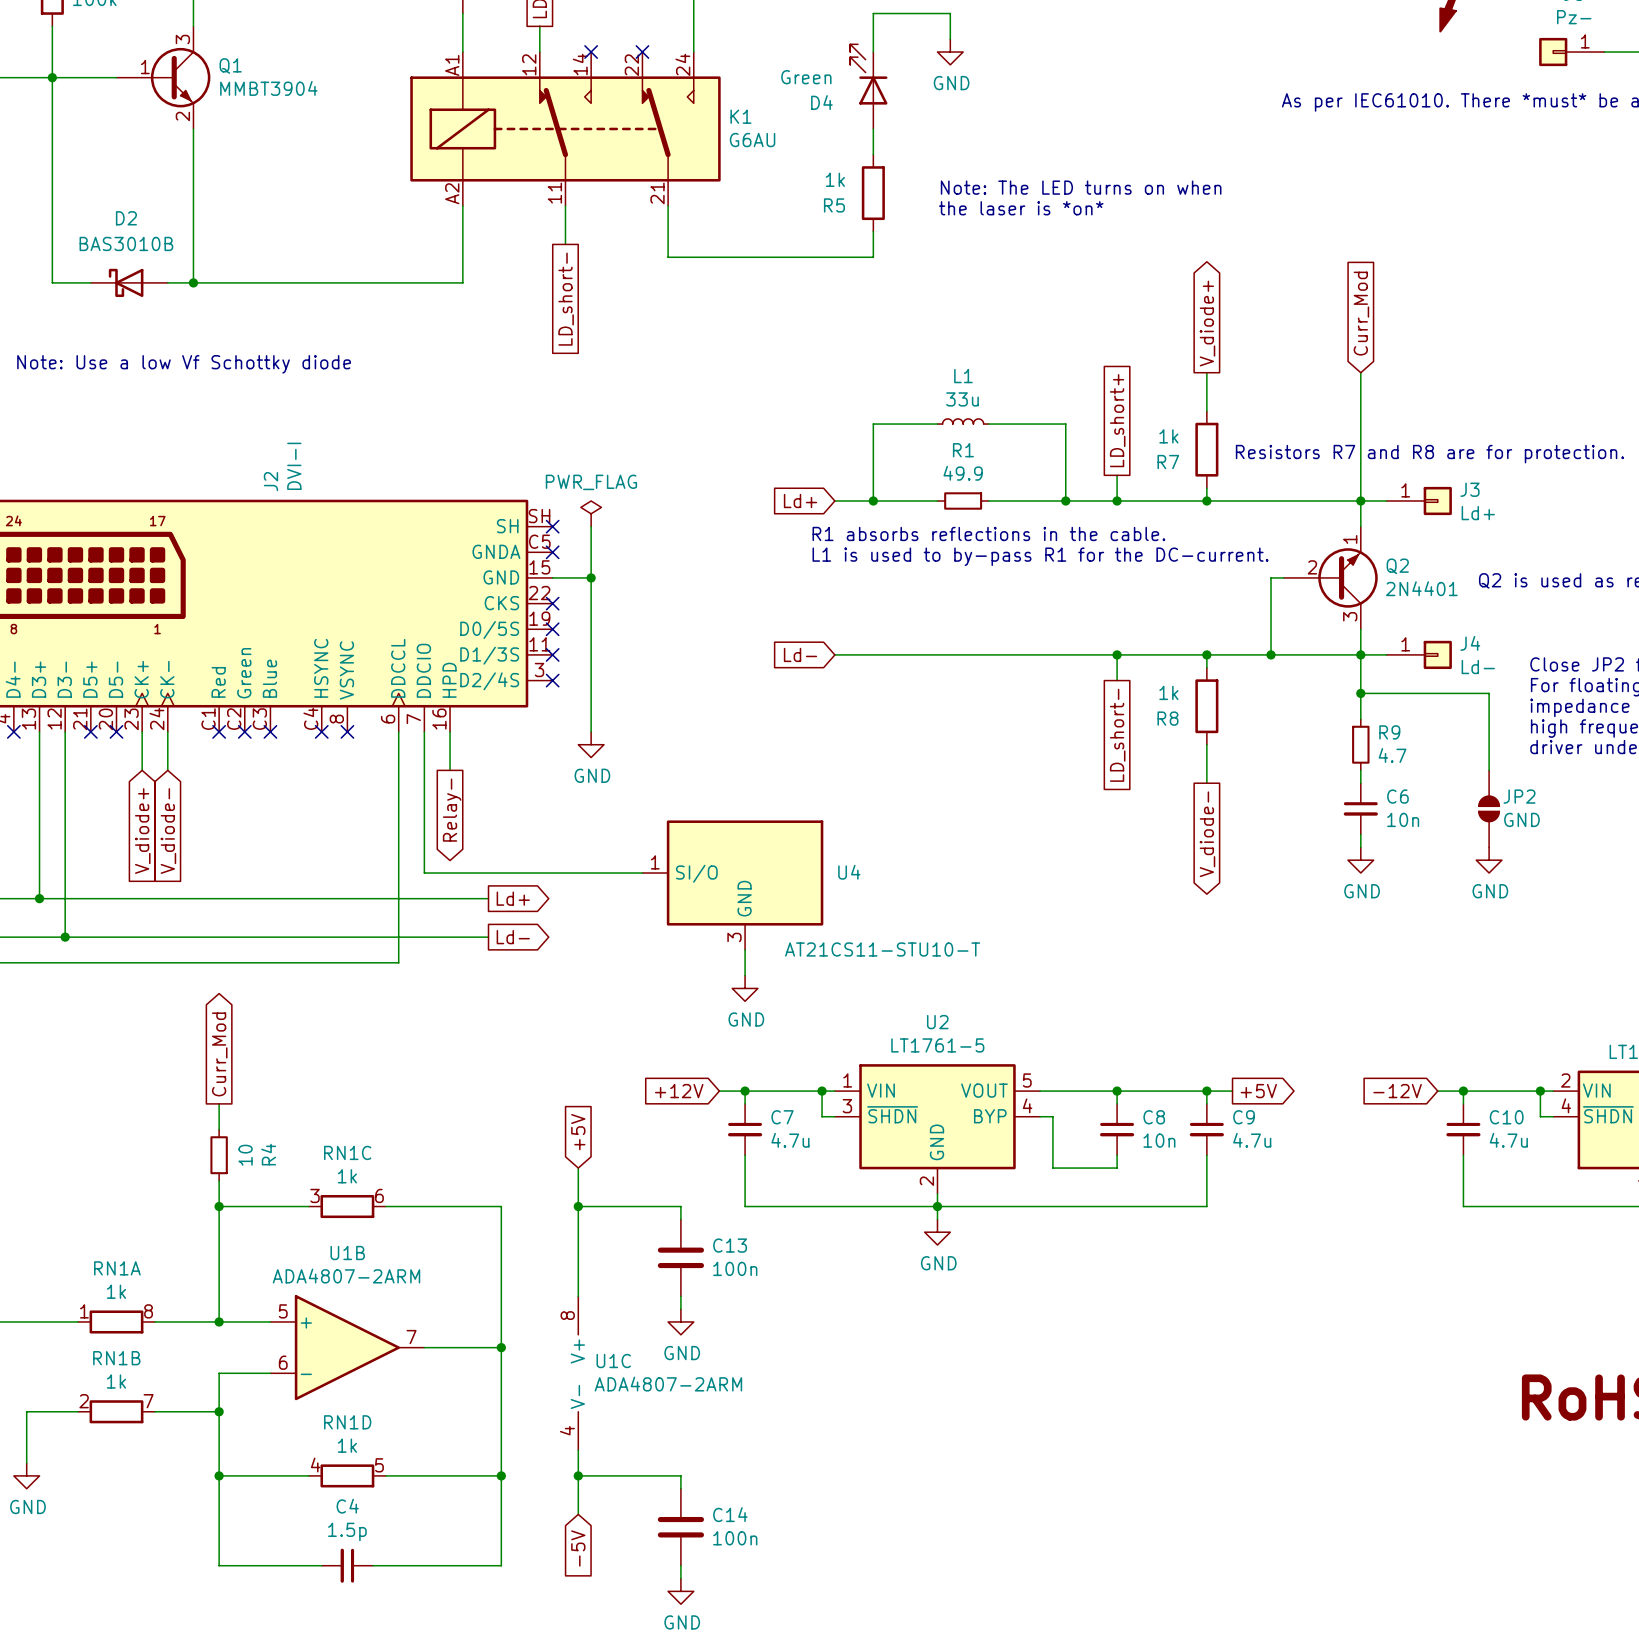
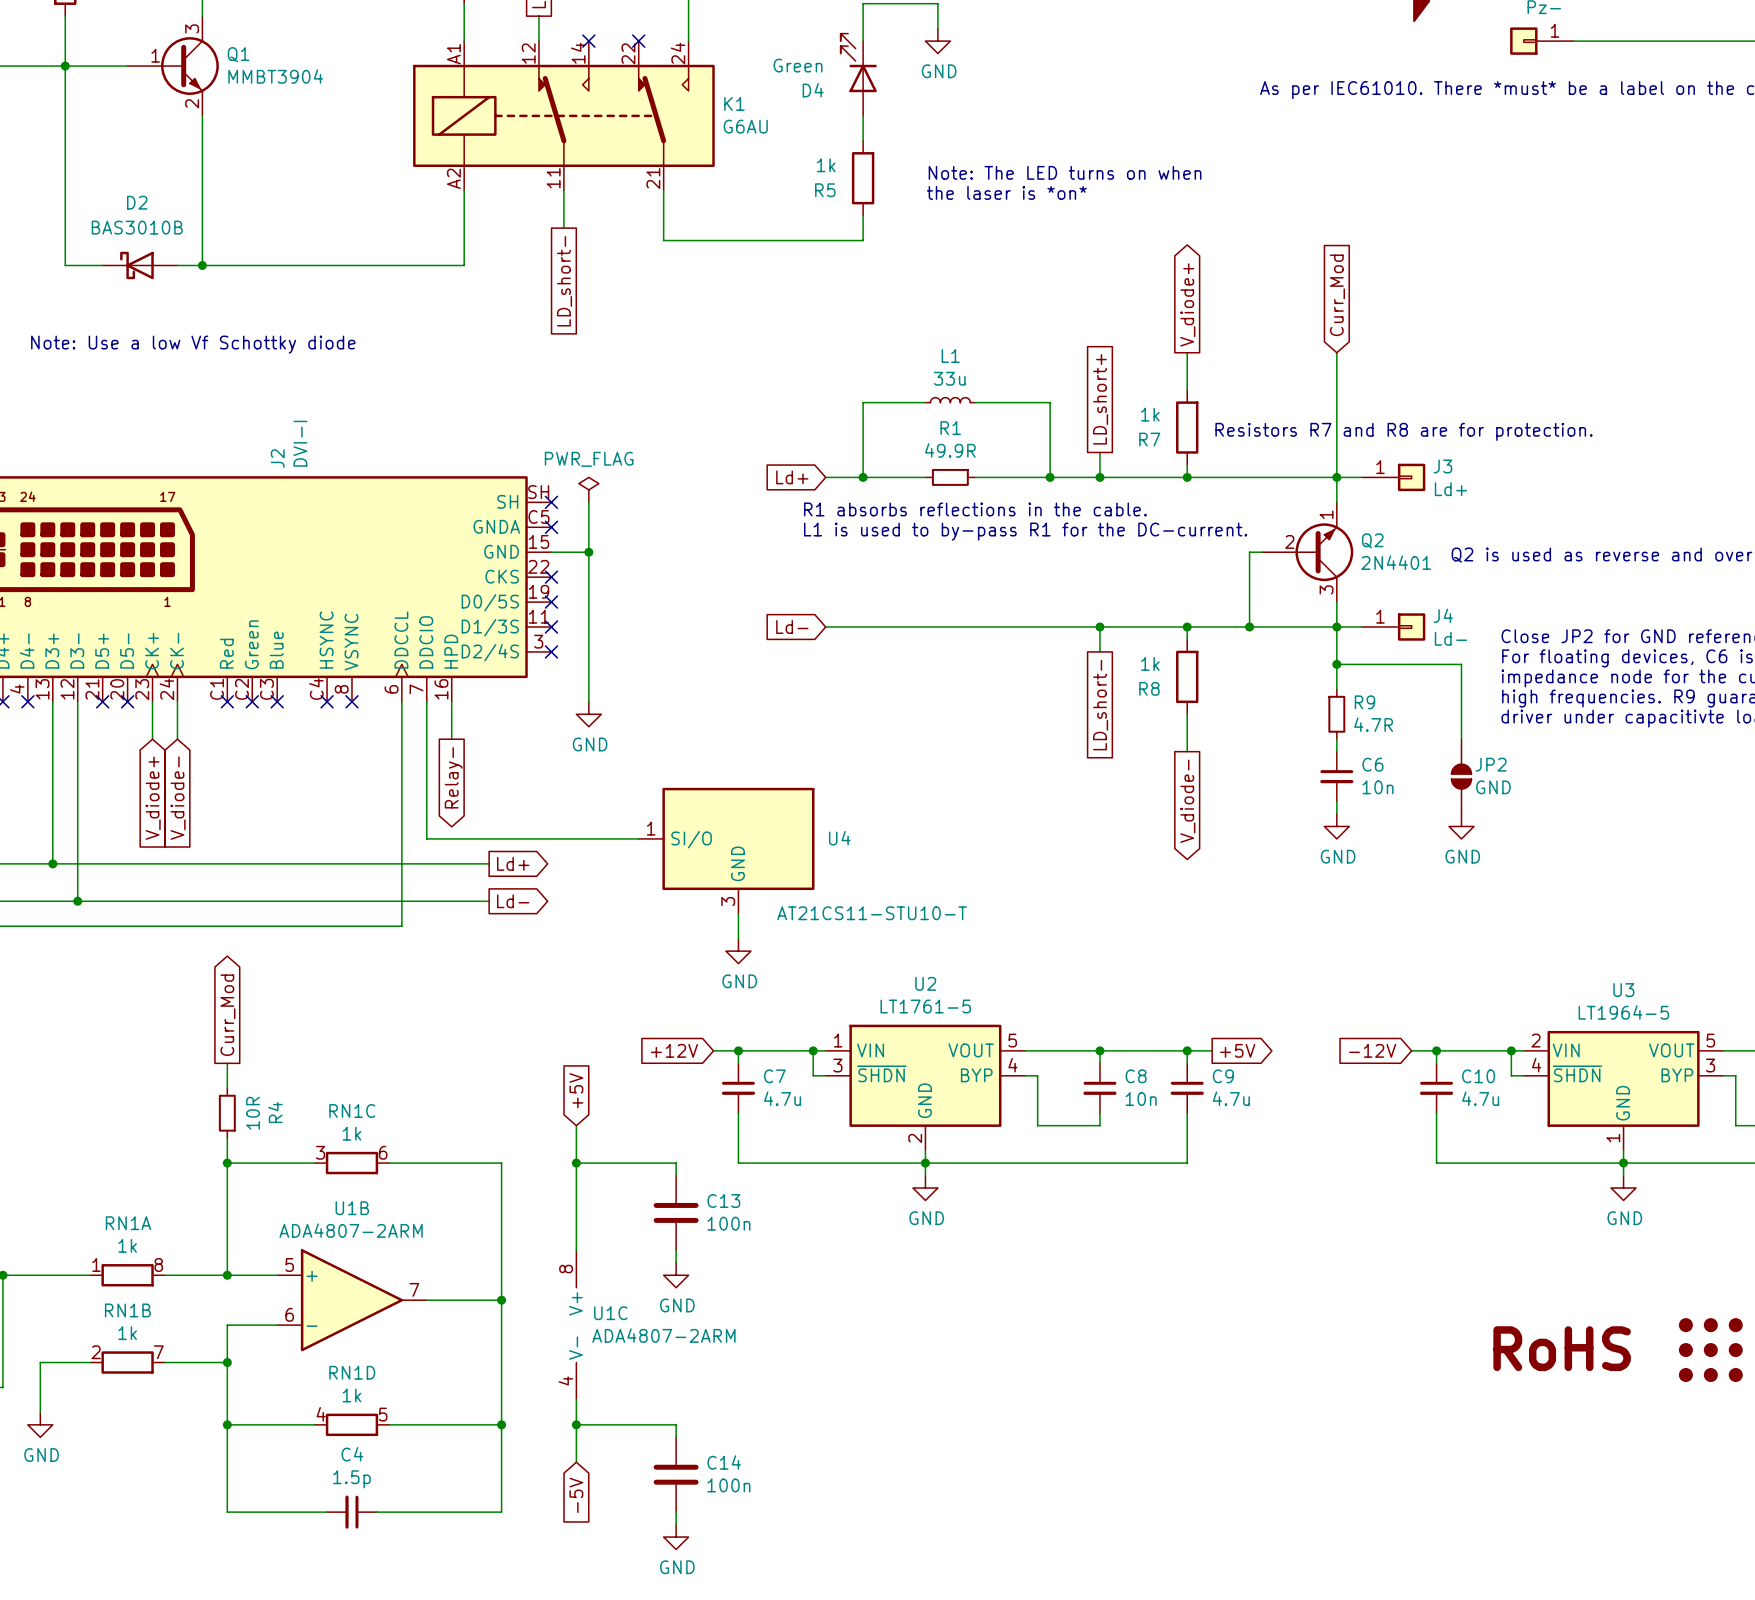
R1 value: 49.9 (963, 473) -> 49.9R (950, 450)
R9 value: 4.7 (1392, 755) -> 4.7R (1373, 724)
R4 value: 10 (245, 1155) -> 10R (253, 1113)

